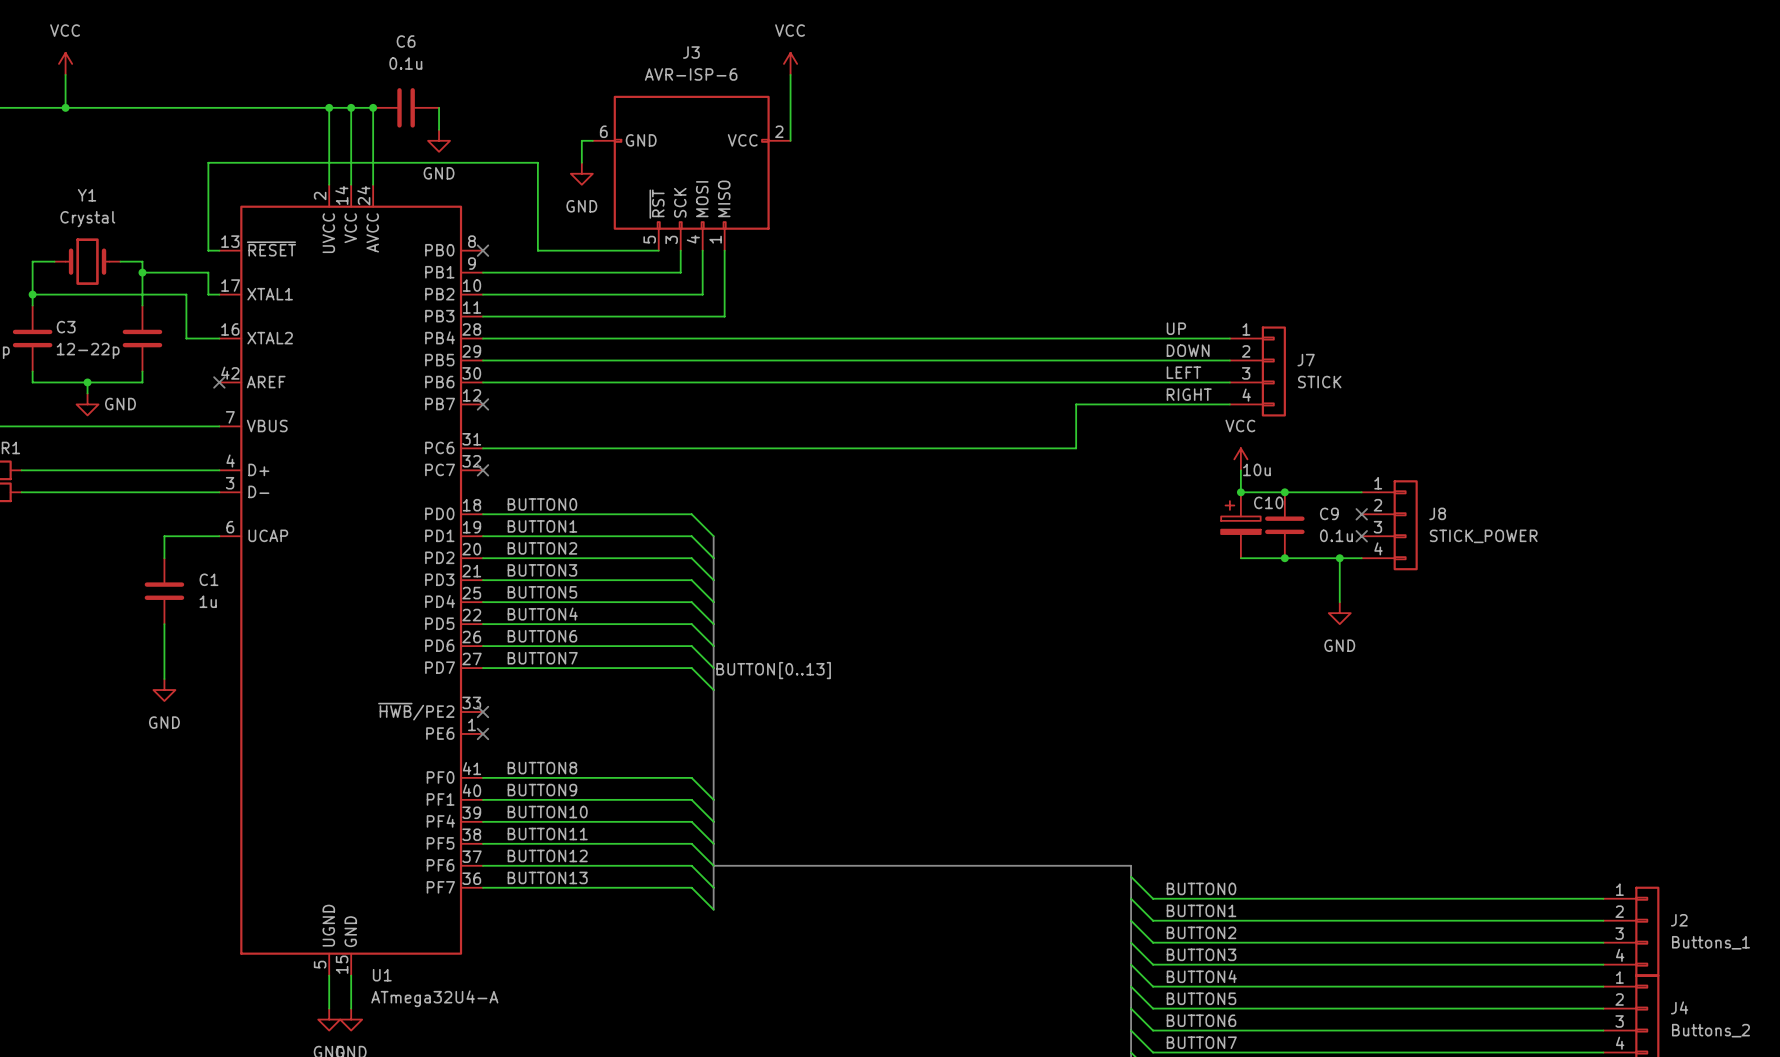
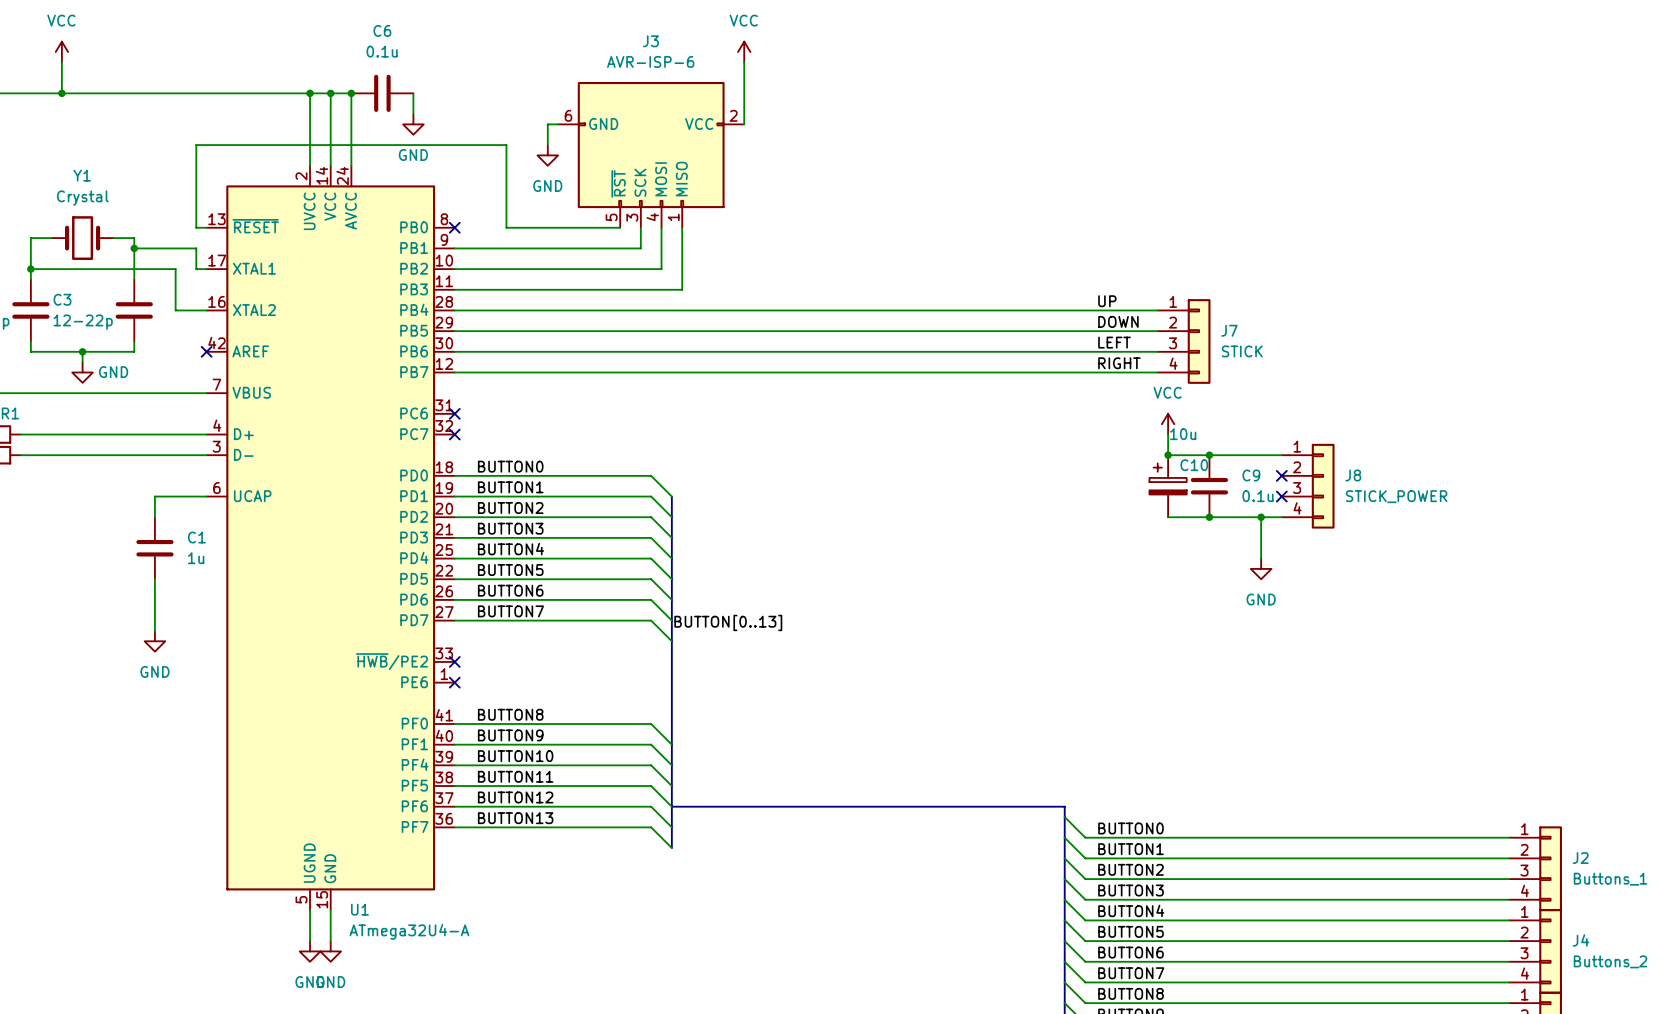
no-connect mark position: (482, 404) -> (454, 413)
wire: (1076, 404) (1076, 448) (482, 448) -> (1013, 372) (454, 372)
label: BUTTON5 (542, 592) -> BUTTON4 (510, 549)
label: BUTTON4 (542, 614) -> BUTTON5 (510, 570)

